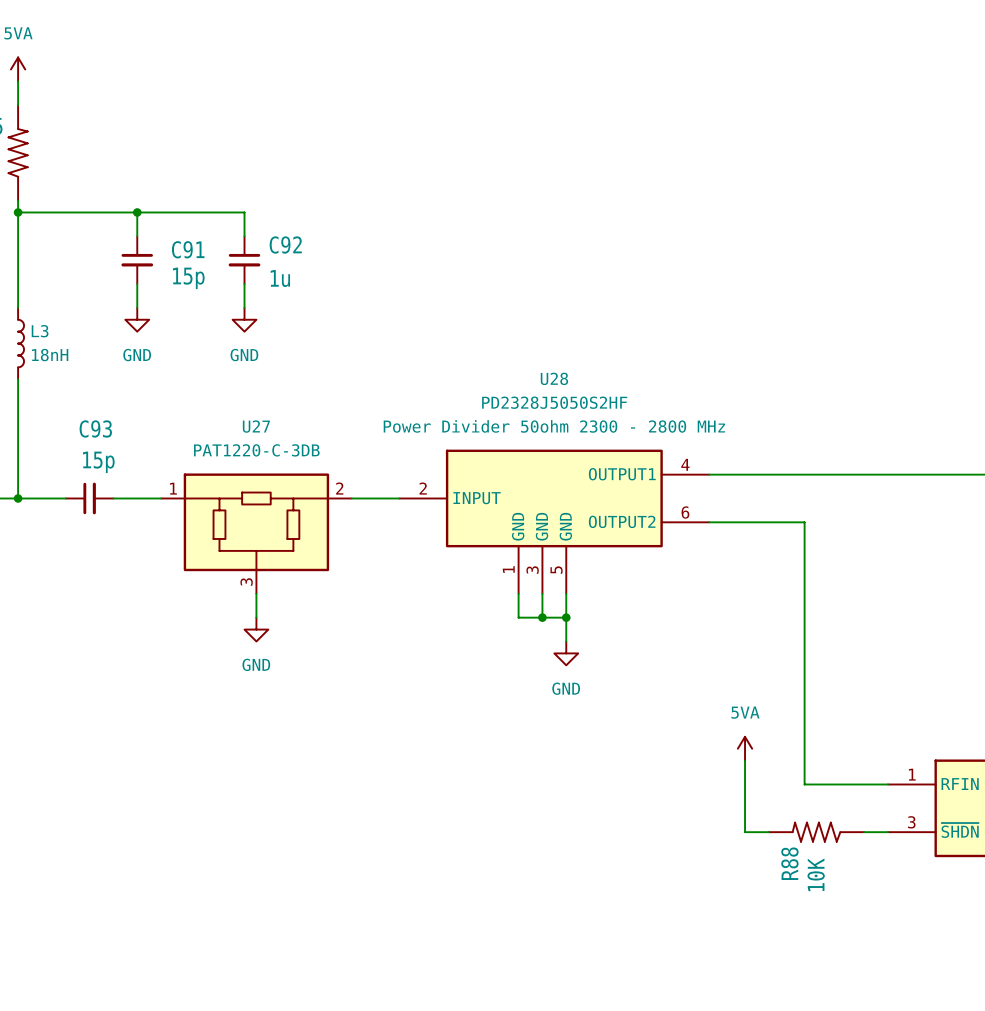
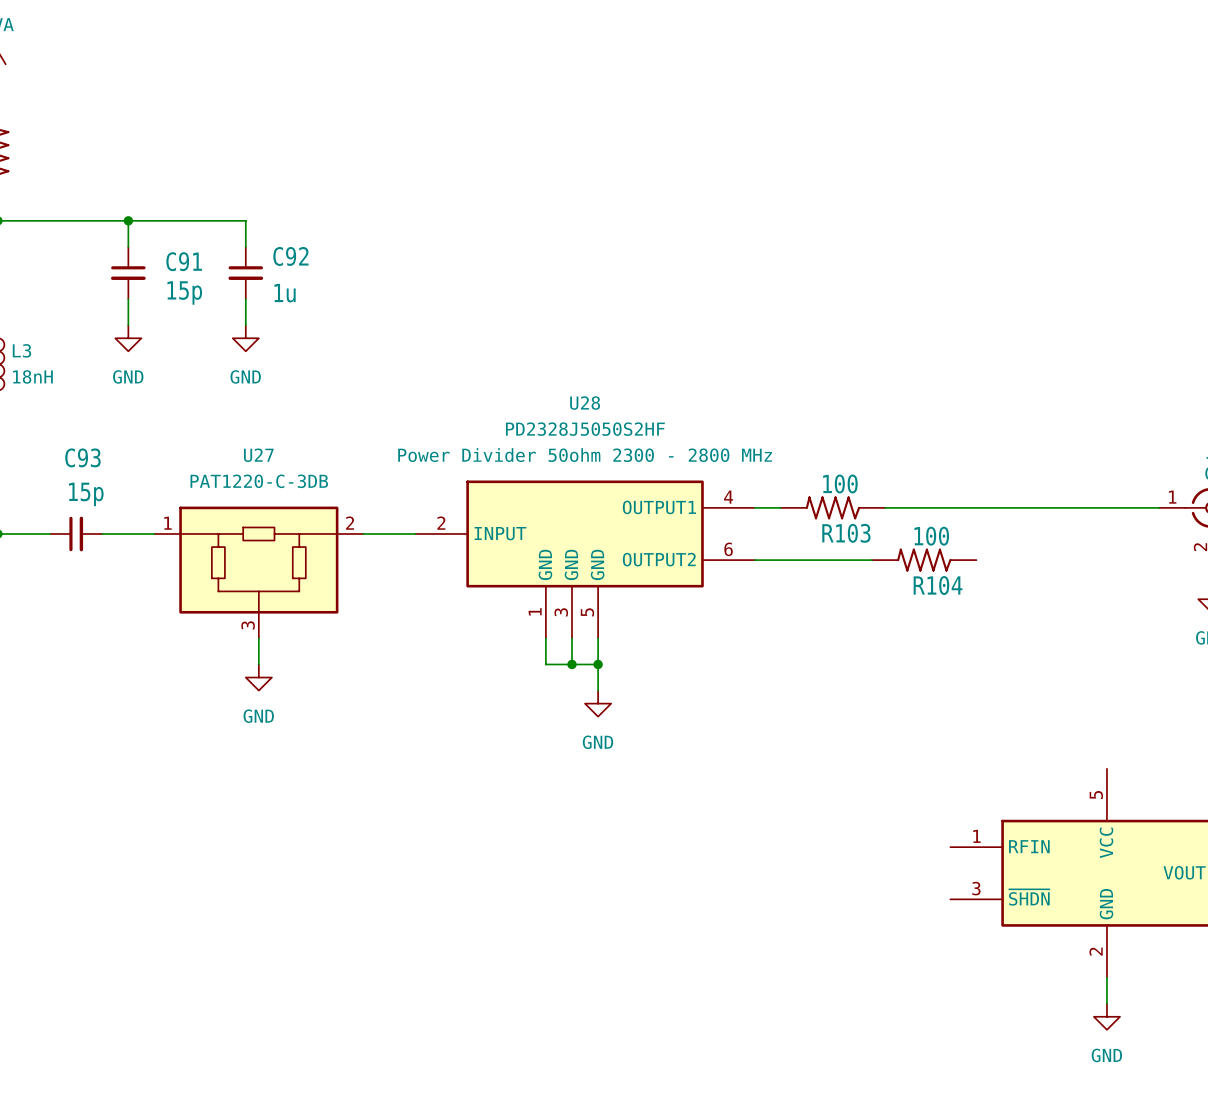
R103: none -> 100 (832, 507)
wire: (804, 522) (804, 784) (888, 784) -> (859, 560) (872, 560)
R104: none -> 100 (924, 560)
power symbol: 5VA (745, 748) -> none
wire: (745, 760) (745, 832) (768, 832) -> none
R88: 10K (816, 832) -> none
wire: (864, 832) (888, 832) -> none

